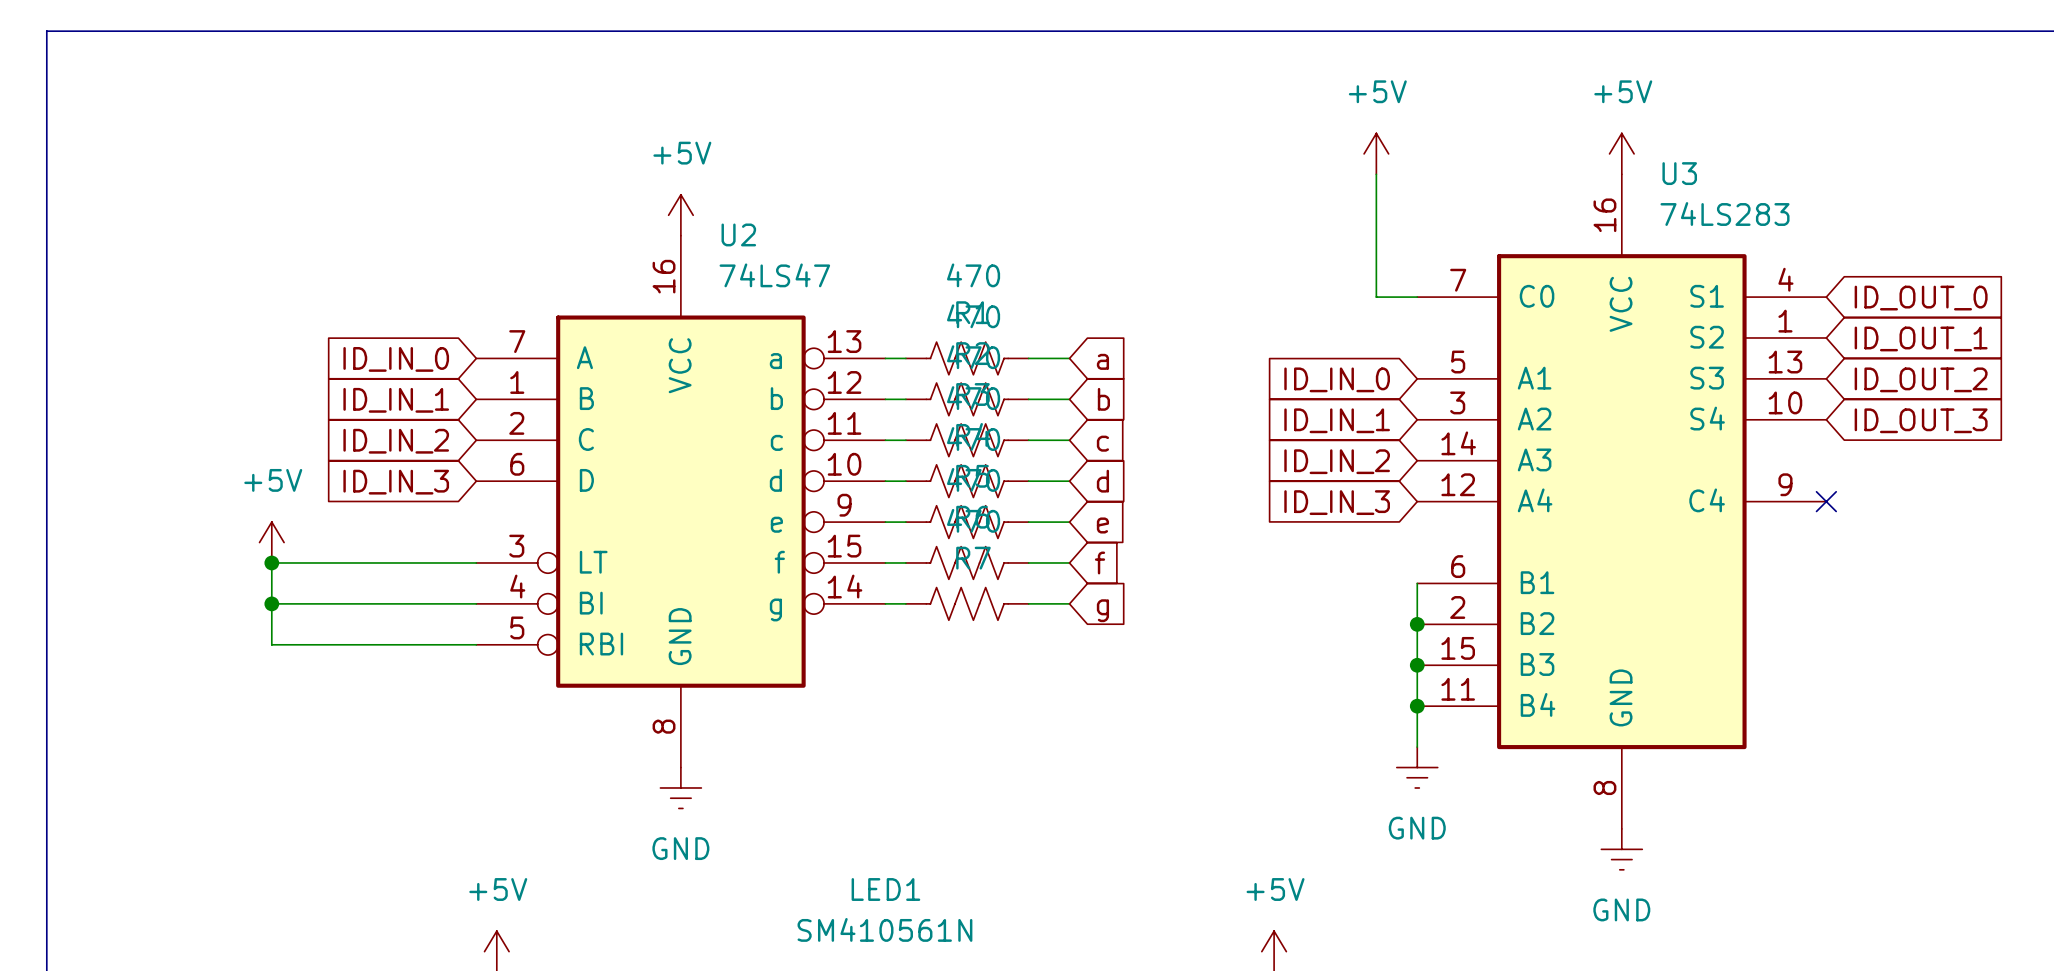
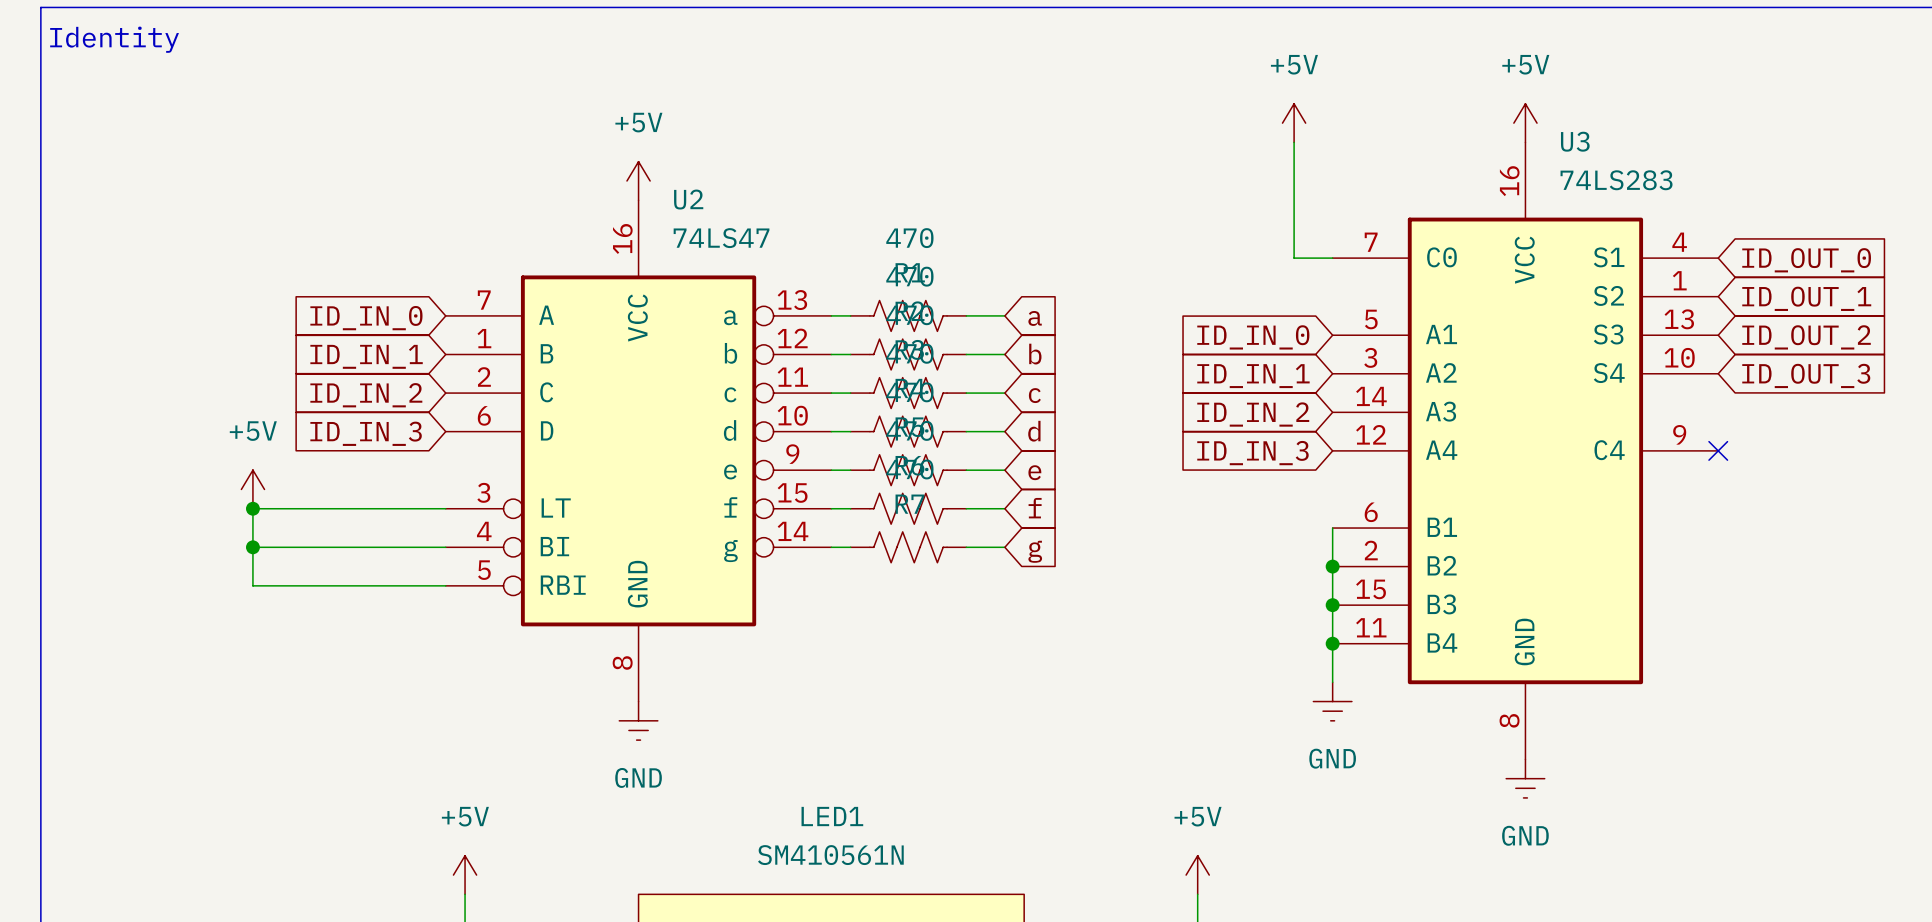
text: none -> Identity (114, 39)

